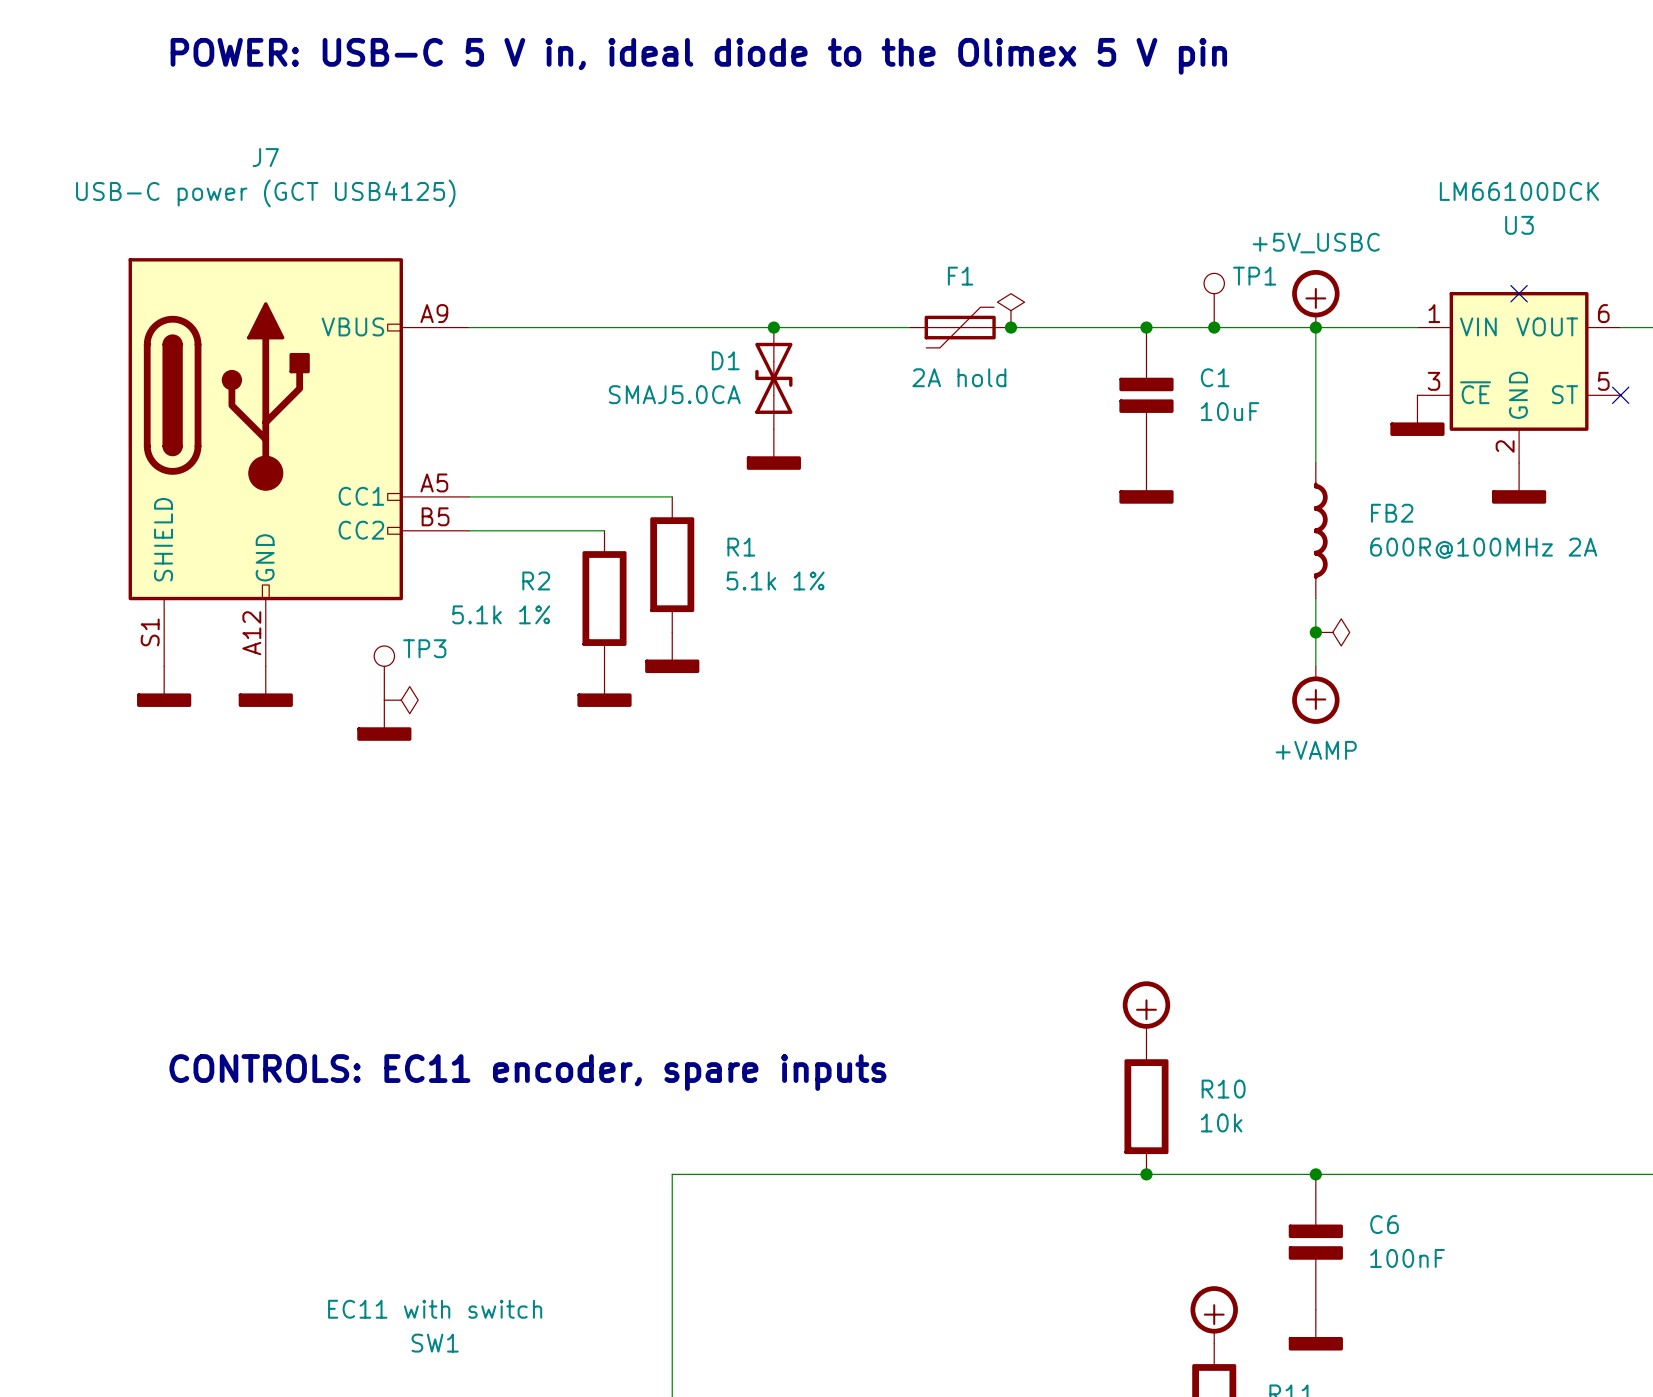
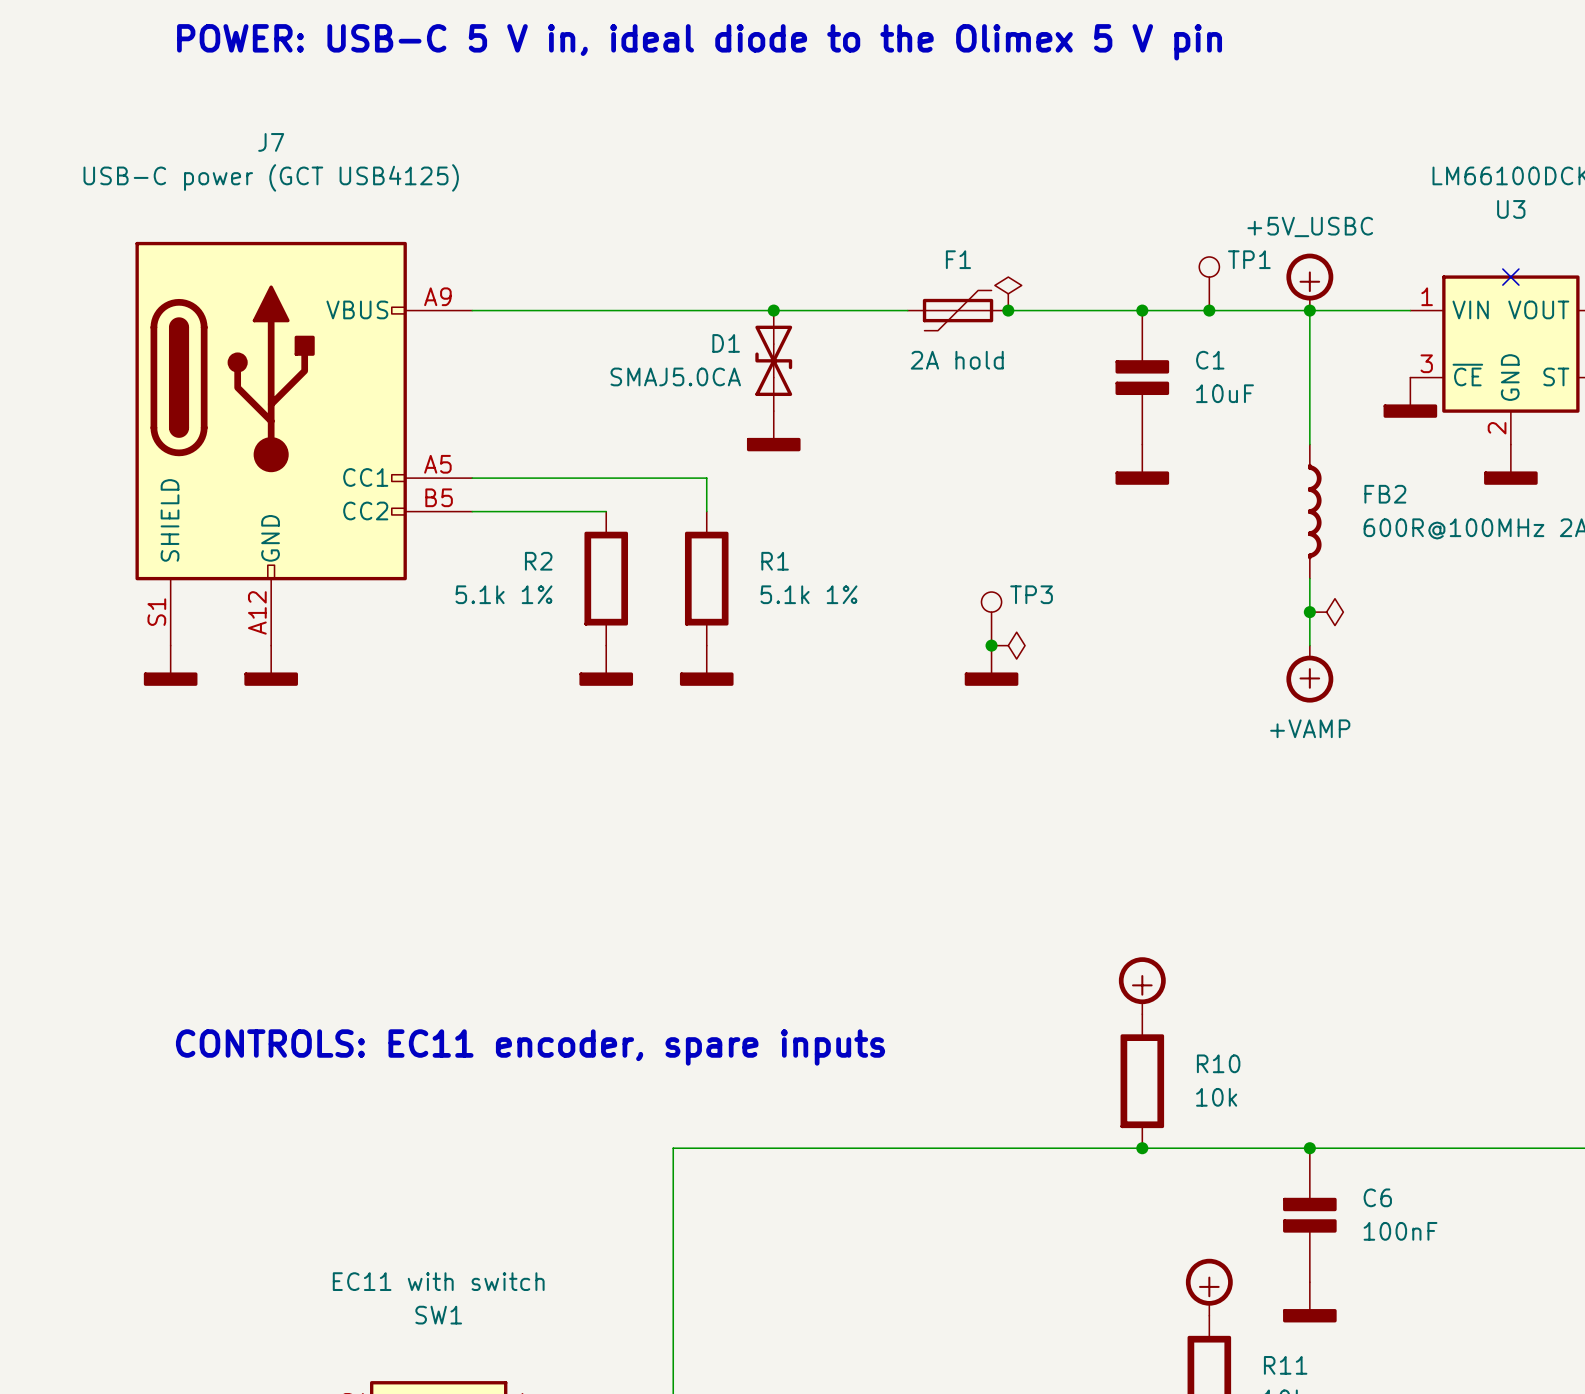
wire: none -> (673, 478) (706, 478) (706, 511)
R1 position: (672, 564) -> (706, 578)
power symbol position: (672, 652) -> (706, 665)
junction: none -> (991, 645)
power symbol: none -> (1008, 645)
TP3 position: (384, 673) -> (991, 618)
power symbol: none -> (991, 665)
power symbol: (401, 700) -> none
power symbol: (384, 720) -> none

